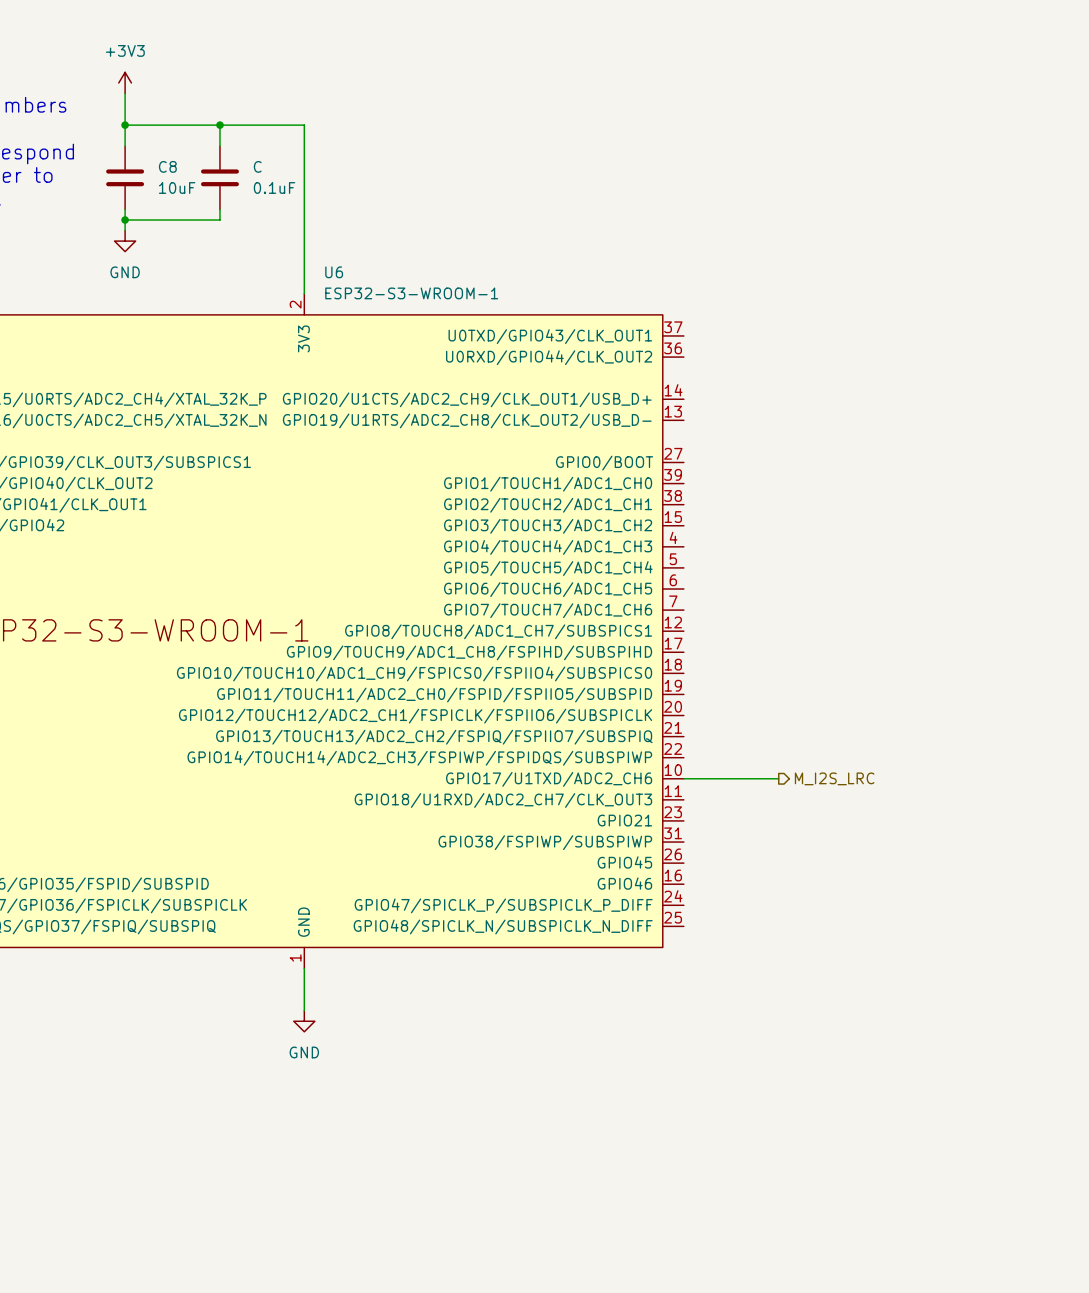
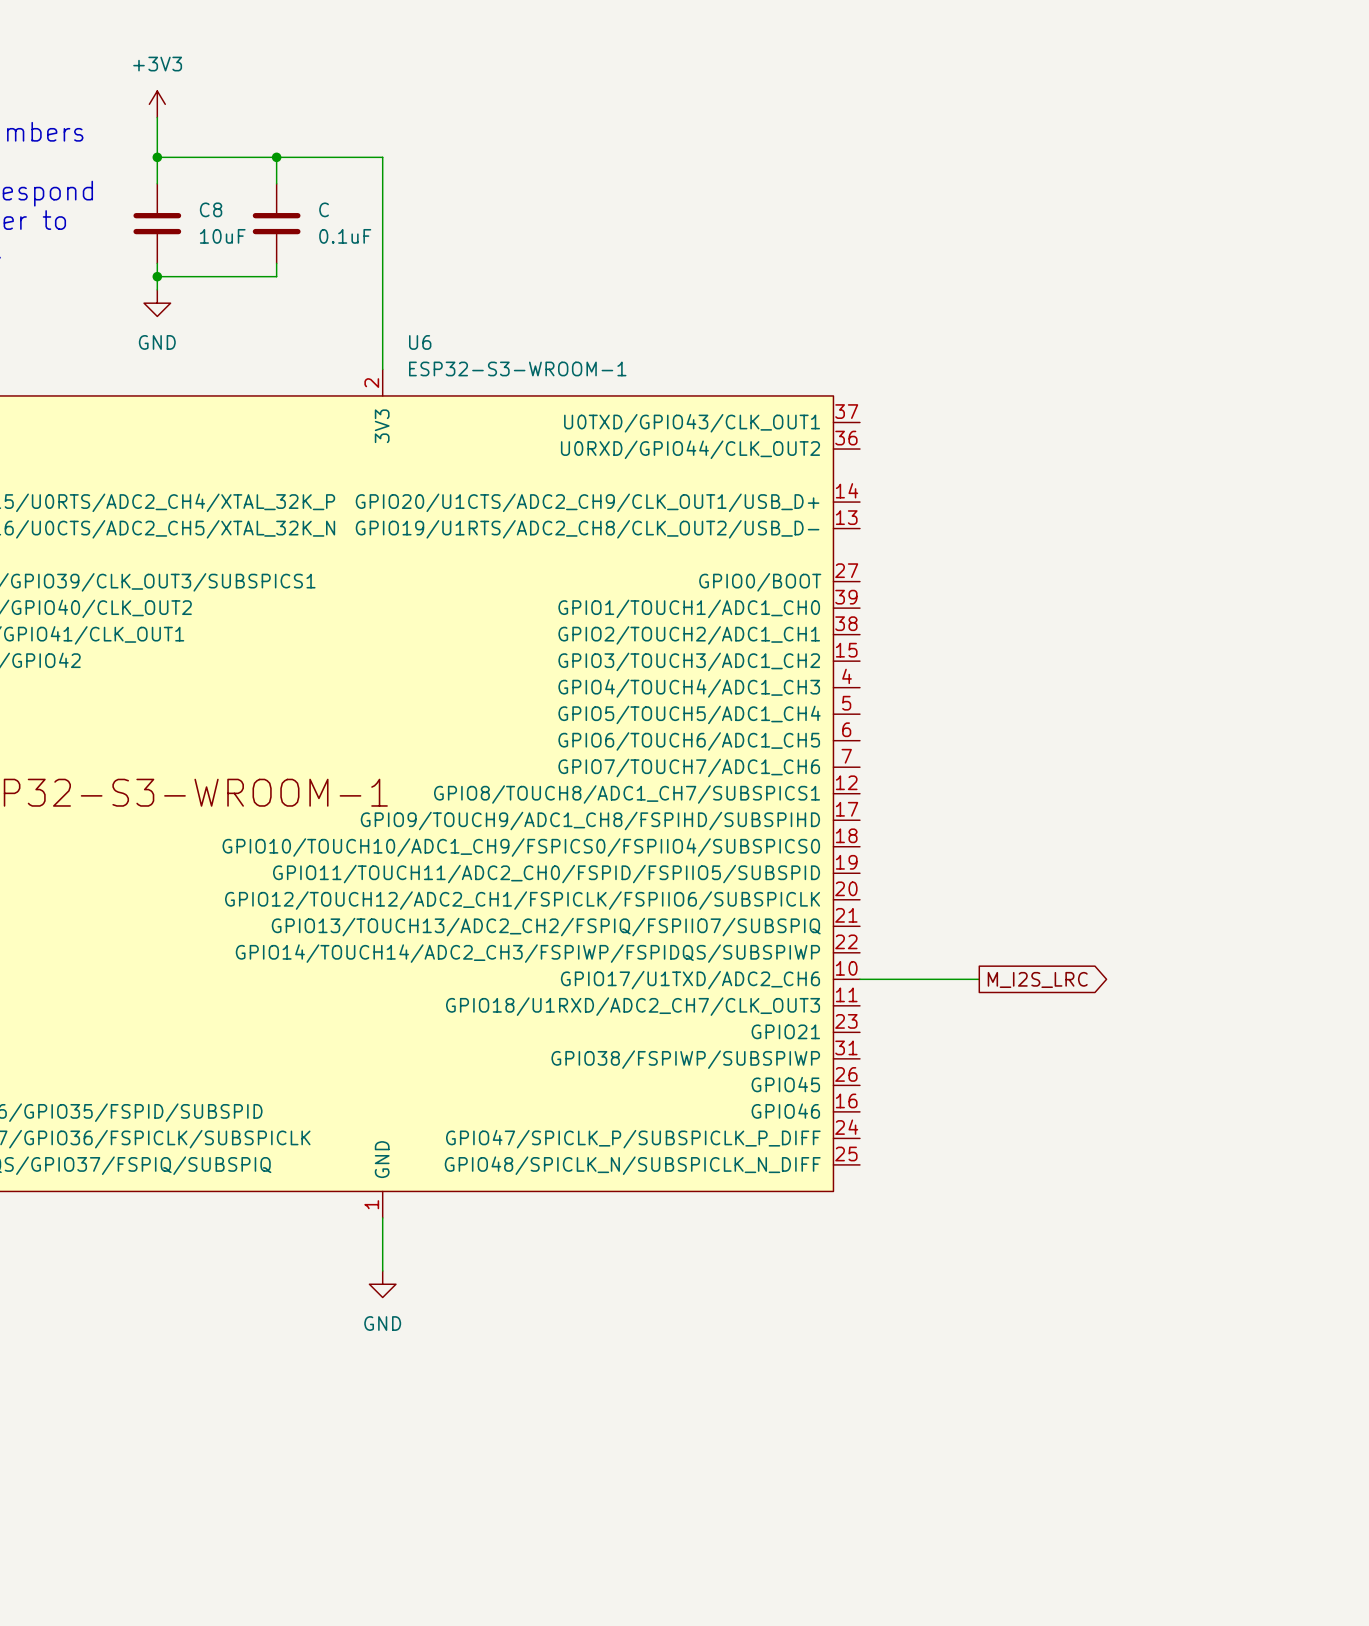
hierarchical label: M_I2S_LRC (834, 778) -> none
global label: none -> M_I2S_LRC (1037, 979)

